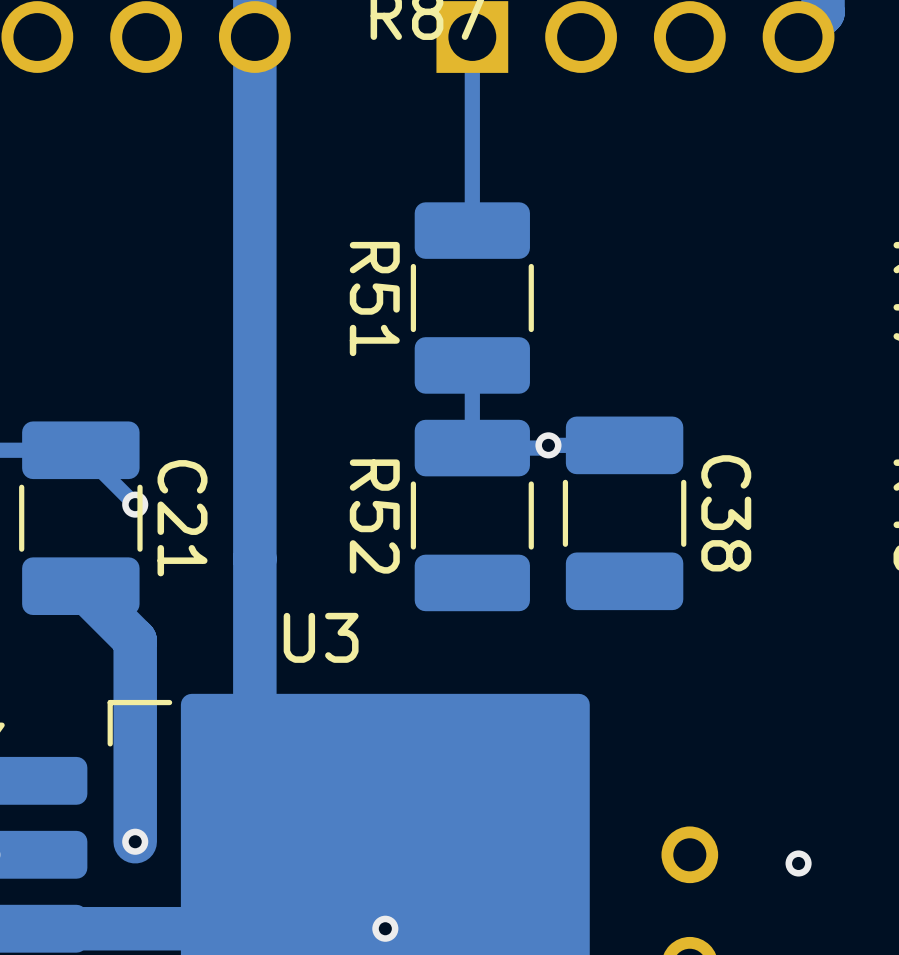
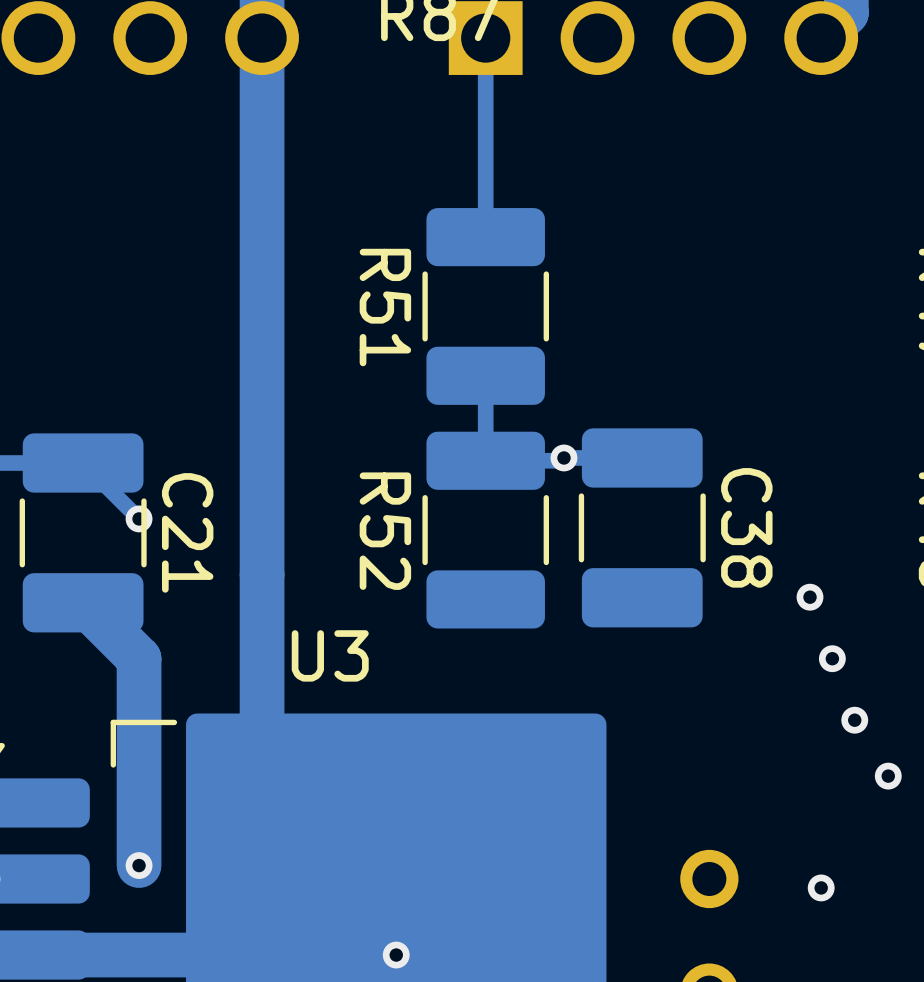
via: none -> (810, 597)
via: none -> (832, 658)
via: none -> (854, 720)
via: none -> (888, 776)

